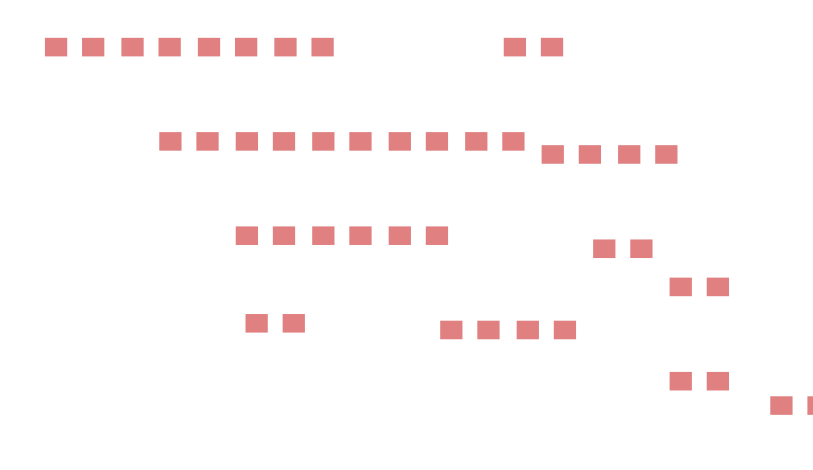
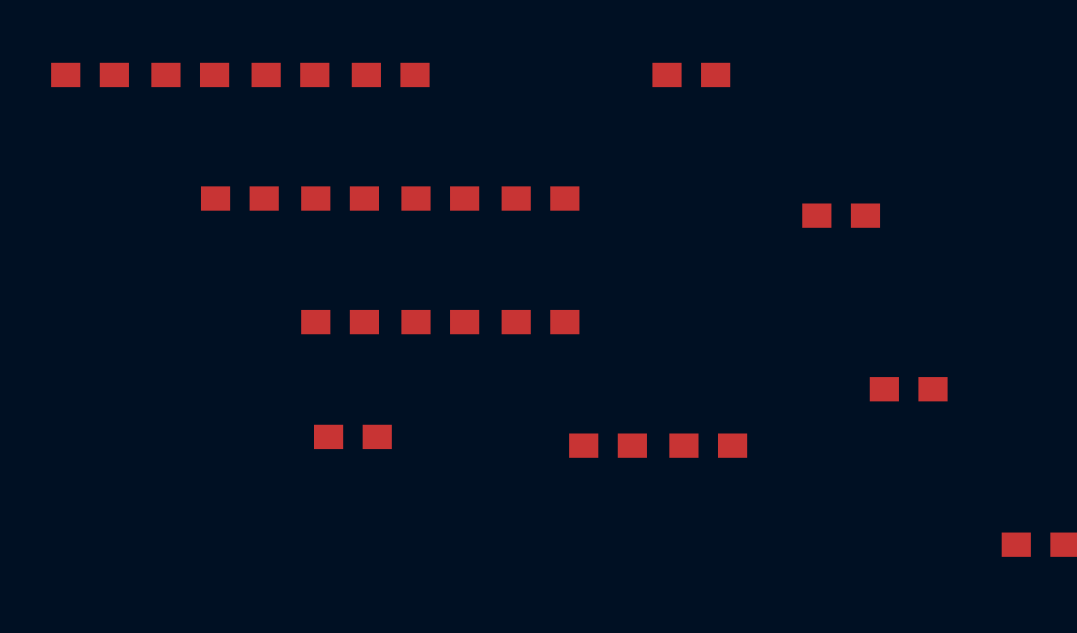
part: (494, 141) -> none
part: (571, 154) -> none
part: (622, 248) -> none
part: (699, 381) -> none

